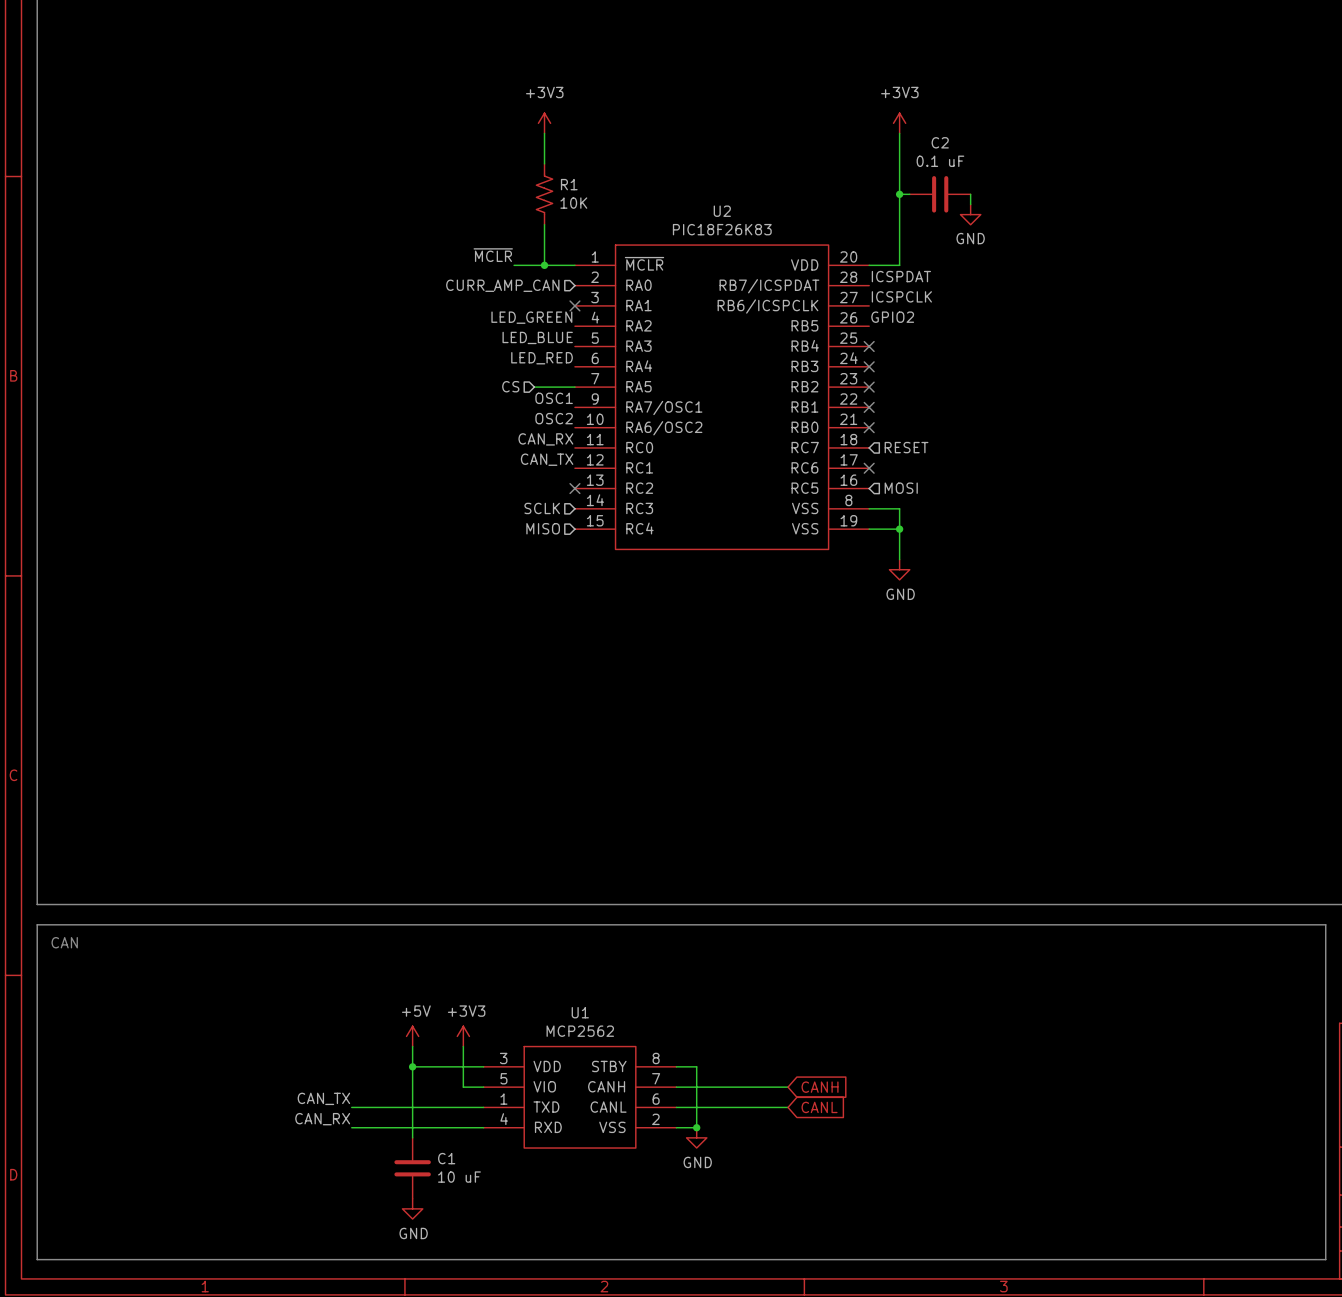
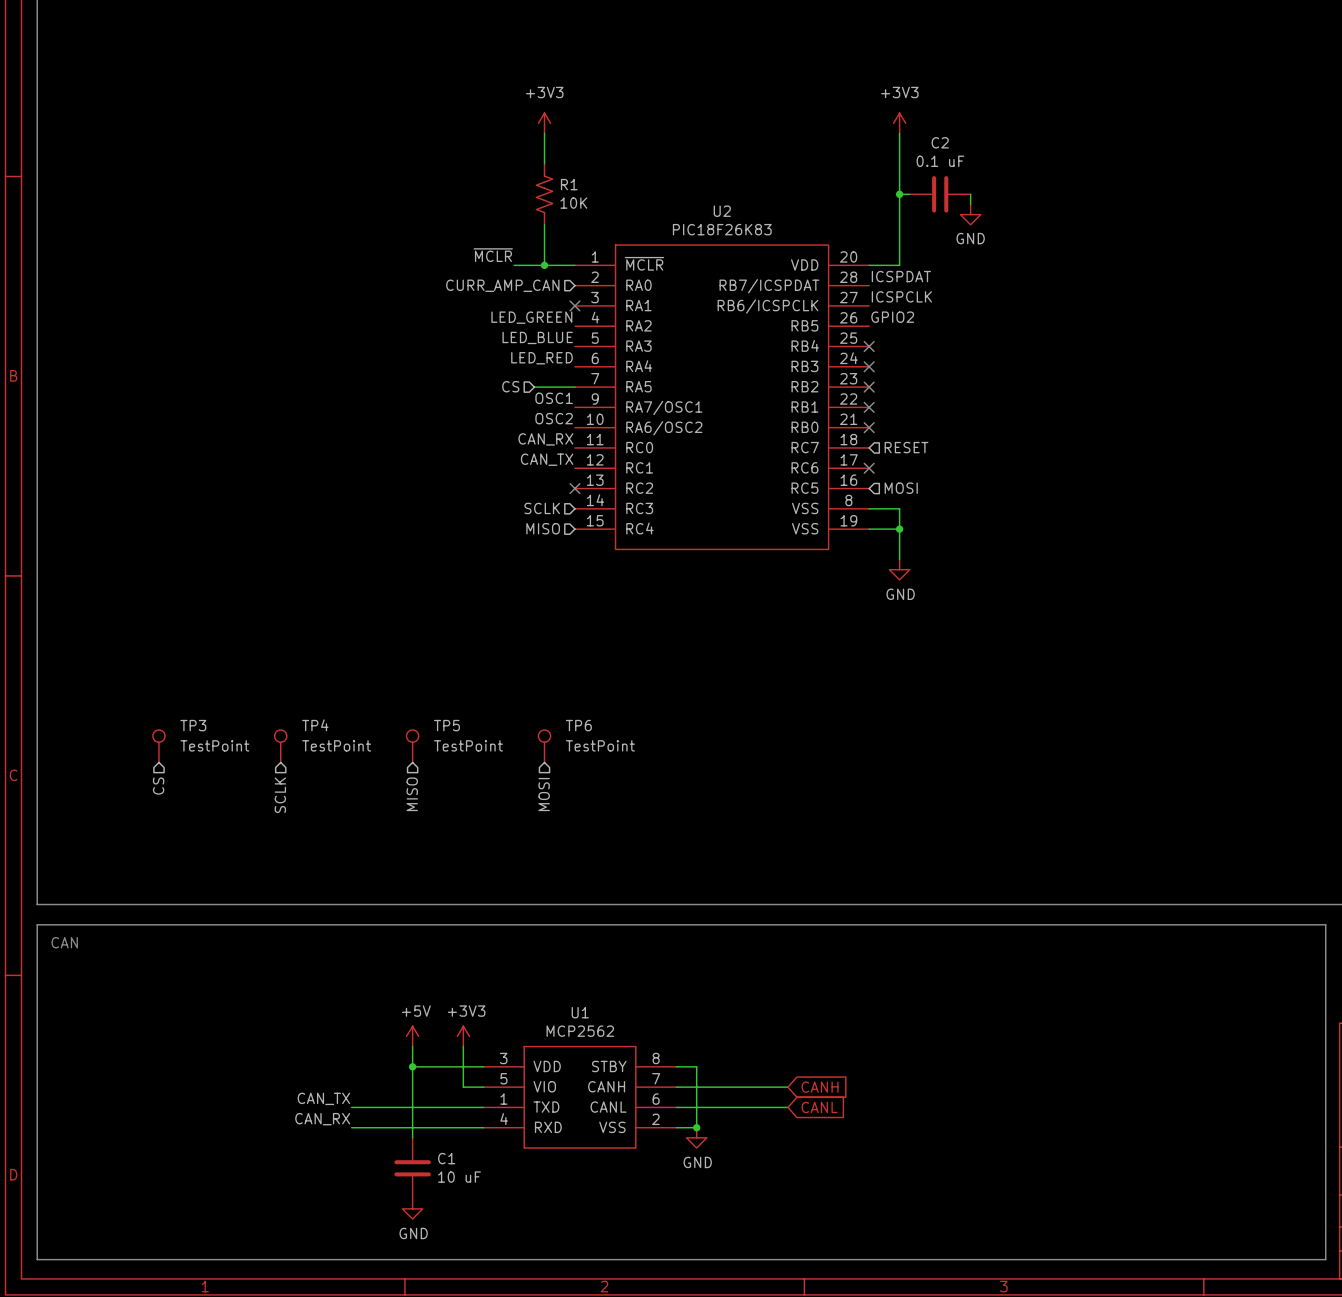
TP3: none -> TestPoint (158, 746)
TP4: none -> TestPoint (280, 746)
TP5: none -> TestPoint (412, 746)
TP6: none -> TestPoint (544, 746)
hierarchical label: none -> CS (158, 786)
hierarchical label: none -> MISO (412, 794)
hierarchical label: none -> MOSI (544, 794)
hierarchical label: none -> SCLK (280, 795)

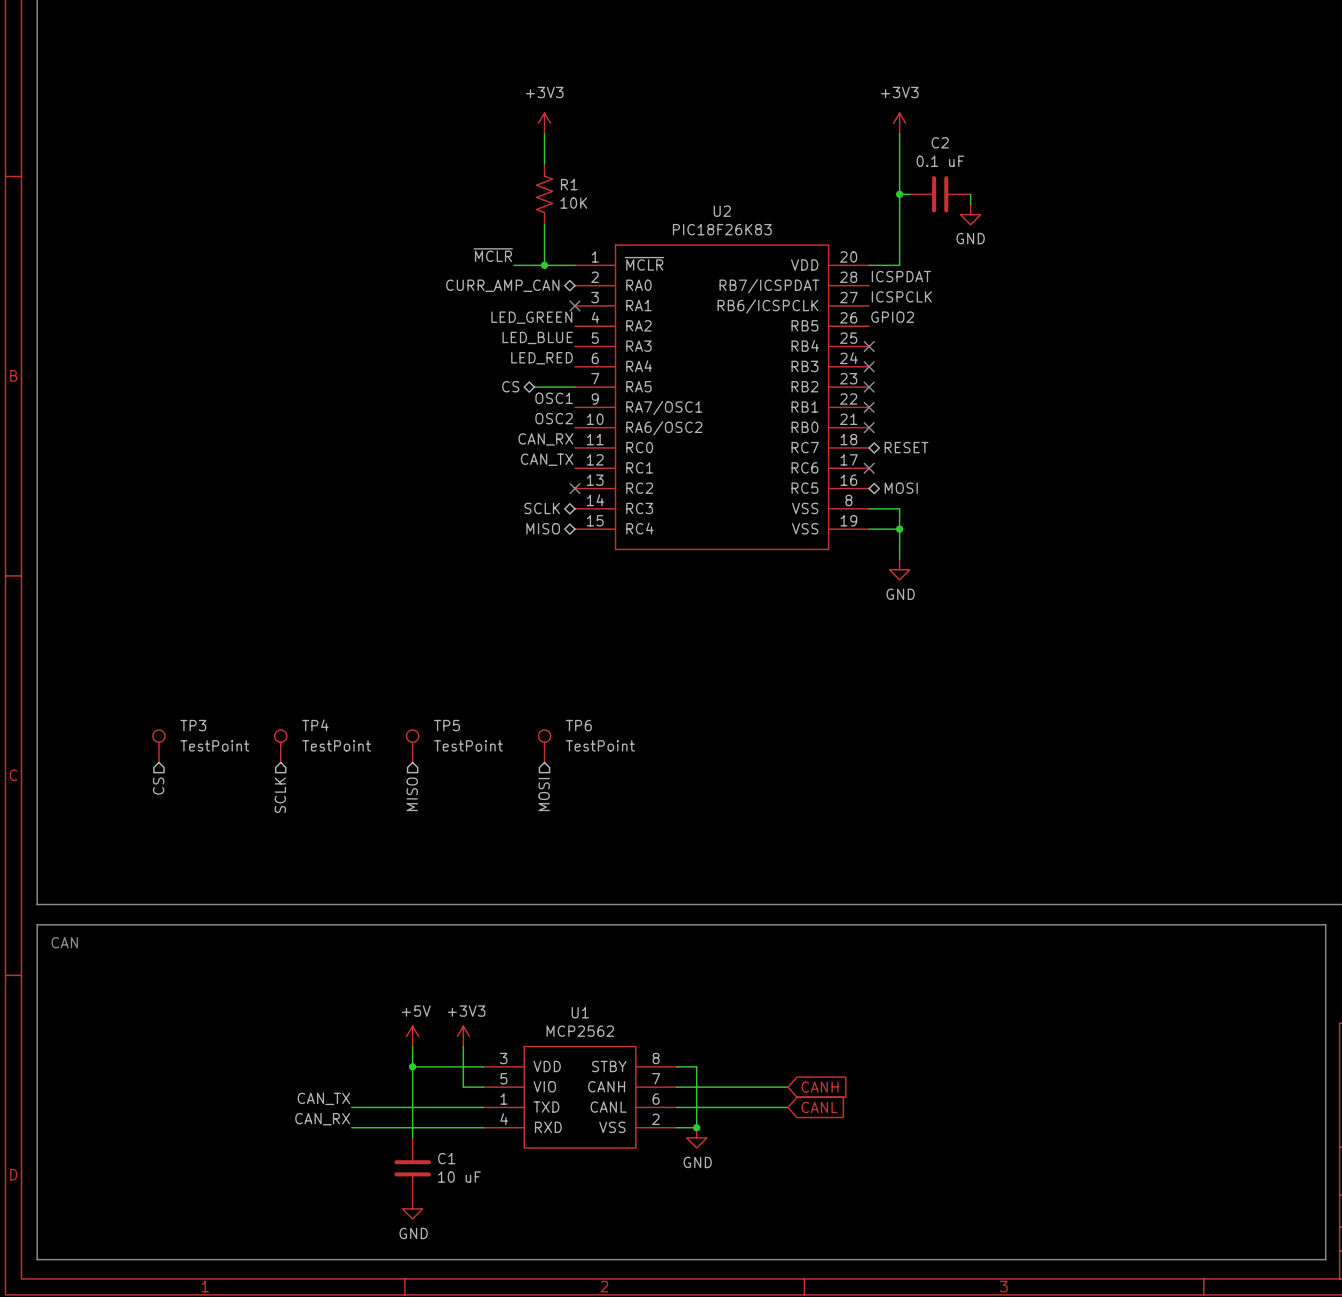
hierarchical label shape: input (502, 285) -> bidirectional (502, 285)
hierarchical label shape: input (510, 386) -> bidirectional (510, 386)
hierarchical label shape: input (906, 447) -> bidirectional (906, 447)
hierarchical label shape: input (901, 488) -> bidirectional (901, 488)
hierarchical label shape: input (542, 508) -> bidirectional (542, 508)
hierarchical label shape: input (543, 528) -> bidirectional (543, 528)

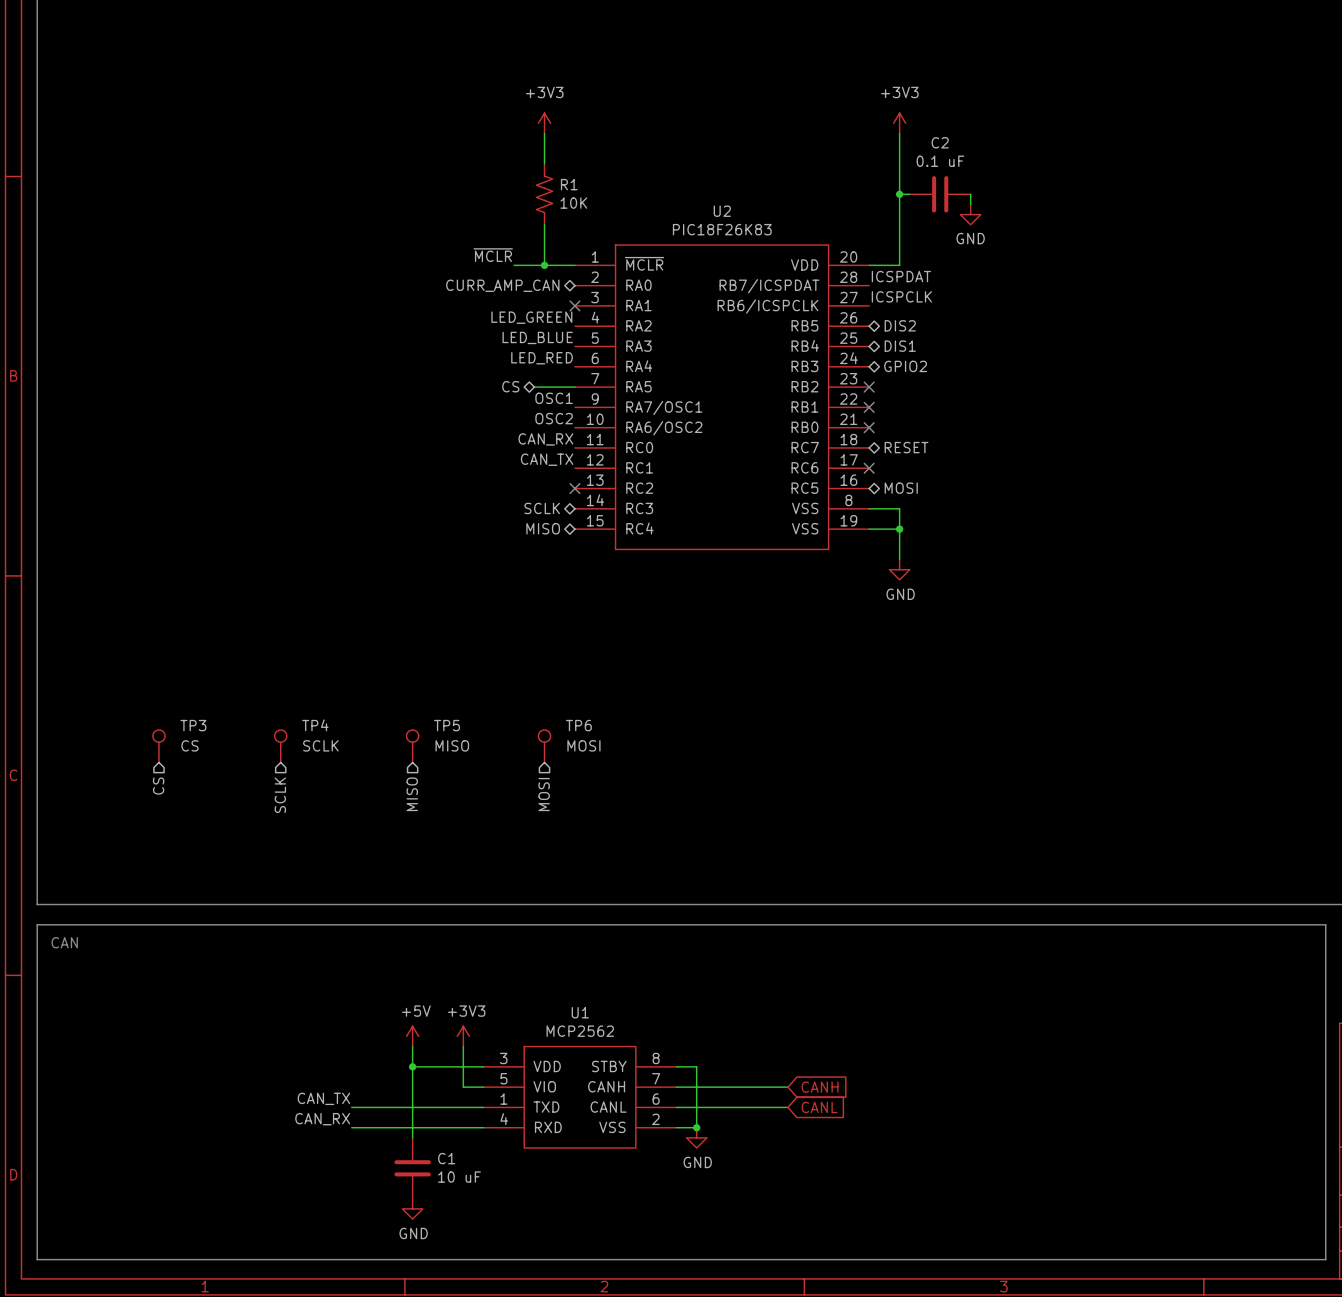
label: GPIO2 (892, 317) -> none
hierarchical label: none -> DIS2 (900, 325)
no-connect mark: (869, 346) -> none
hierarchical label: none -> DIS1 (900, 346)
no-connect mark: (869, 366) -> none
hierarchical label: none -> GPIO2 (905, 366)
TP3 value: TestPoint (214, 745) -> CS (189, 745)
TP4 value: TestPoint (336, 745) -> SCLK (320, 745)
TP5 value: TestPoint (468, 745) -> MISO (452, 745)
TP6 value: TestPoint (600, 745) -> MOSI (583, 745)

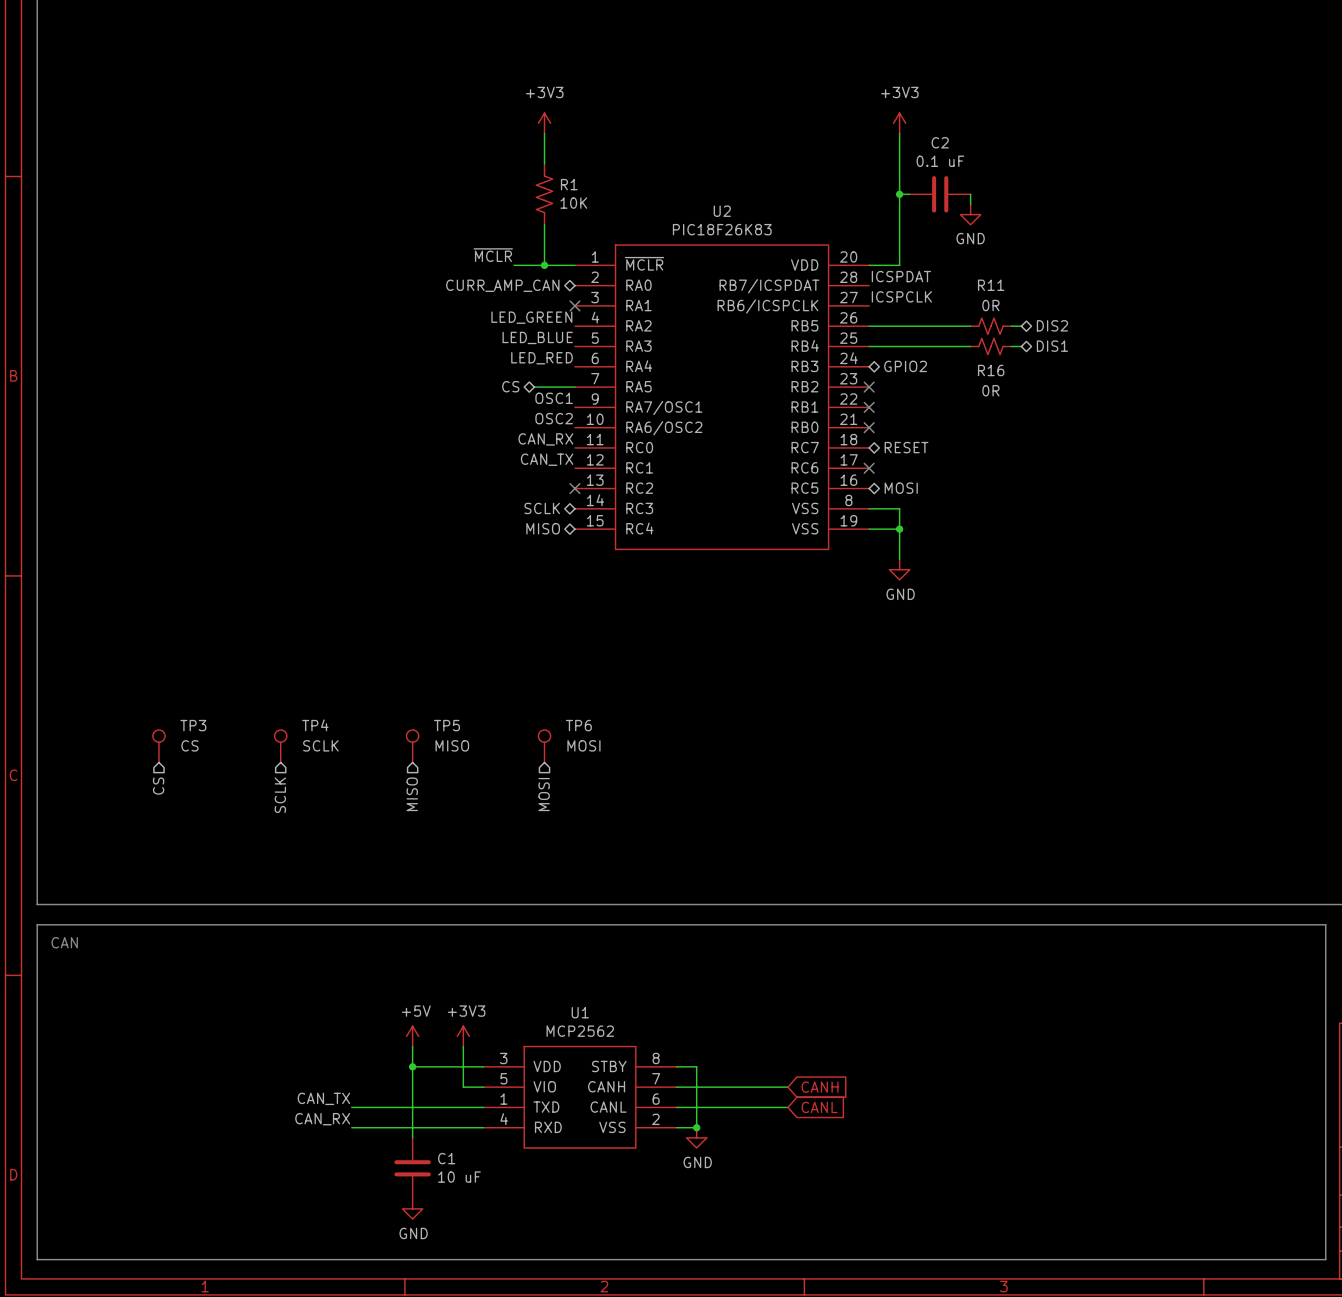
hierarchical label position: DIS2 (900, 325) -> DIS2 (1052, 325)
wire: none -> (869, 326) (970, 326)
R11: none -> 0R (990, 326)
wire: none -> (1011, 326) (1021, 326)
wire: none -> (869, 346) (970, 346)
hierarchical label position: DIS1 (900, 346) -> DIS1 (1052, 346)
R16: none -> 0R (990, 346)
wire: none -> (1011, 346) (1021, 346)

